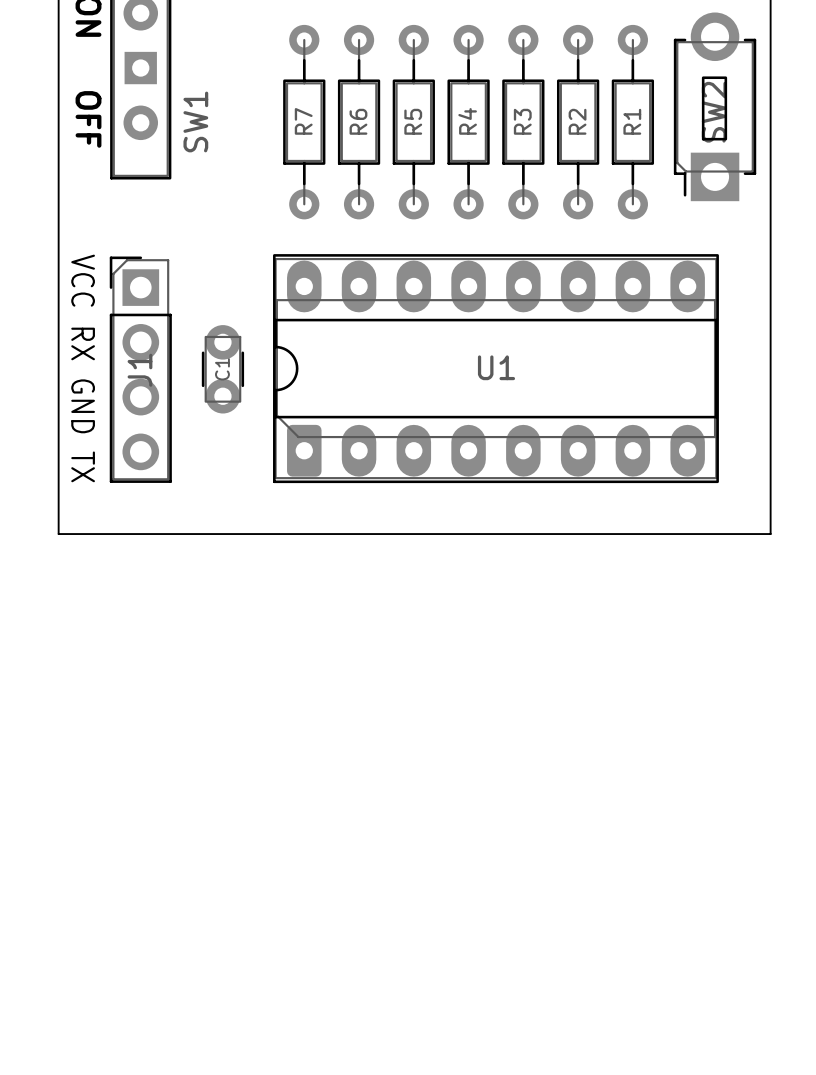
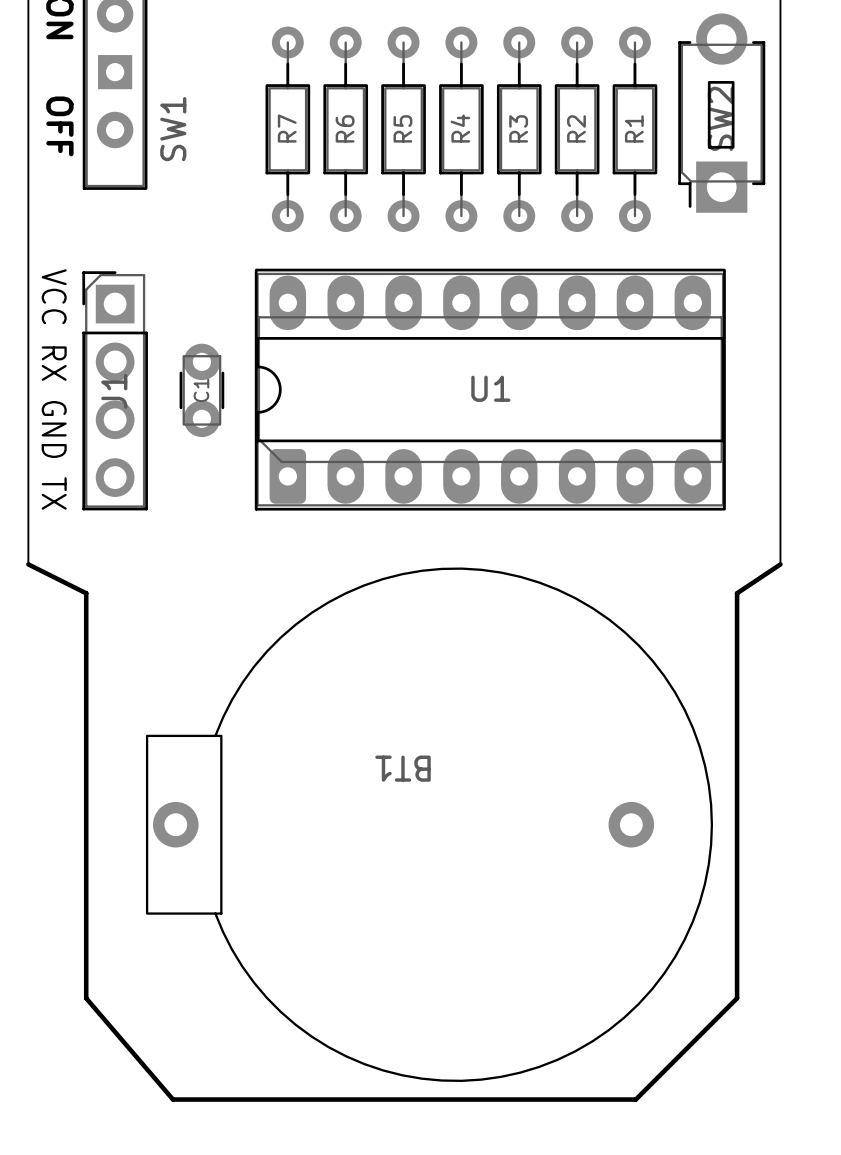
board edge: (58, 534) (770, 534) -> (28, 564) (86, 593) (86, 998) (173, 1099) (635, 1099) (737, 998) (737, 593) (780, 564)
BT1: none -> (429, 824)

